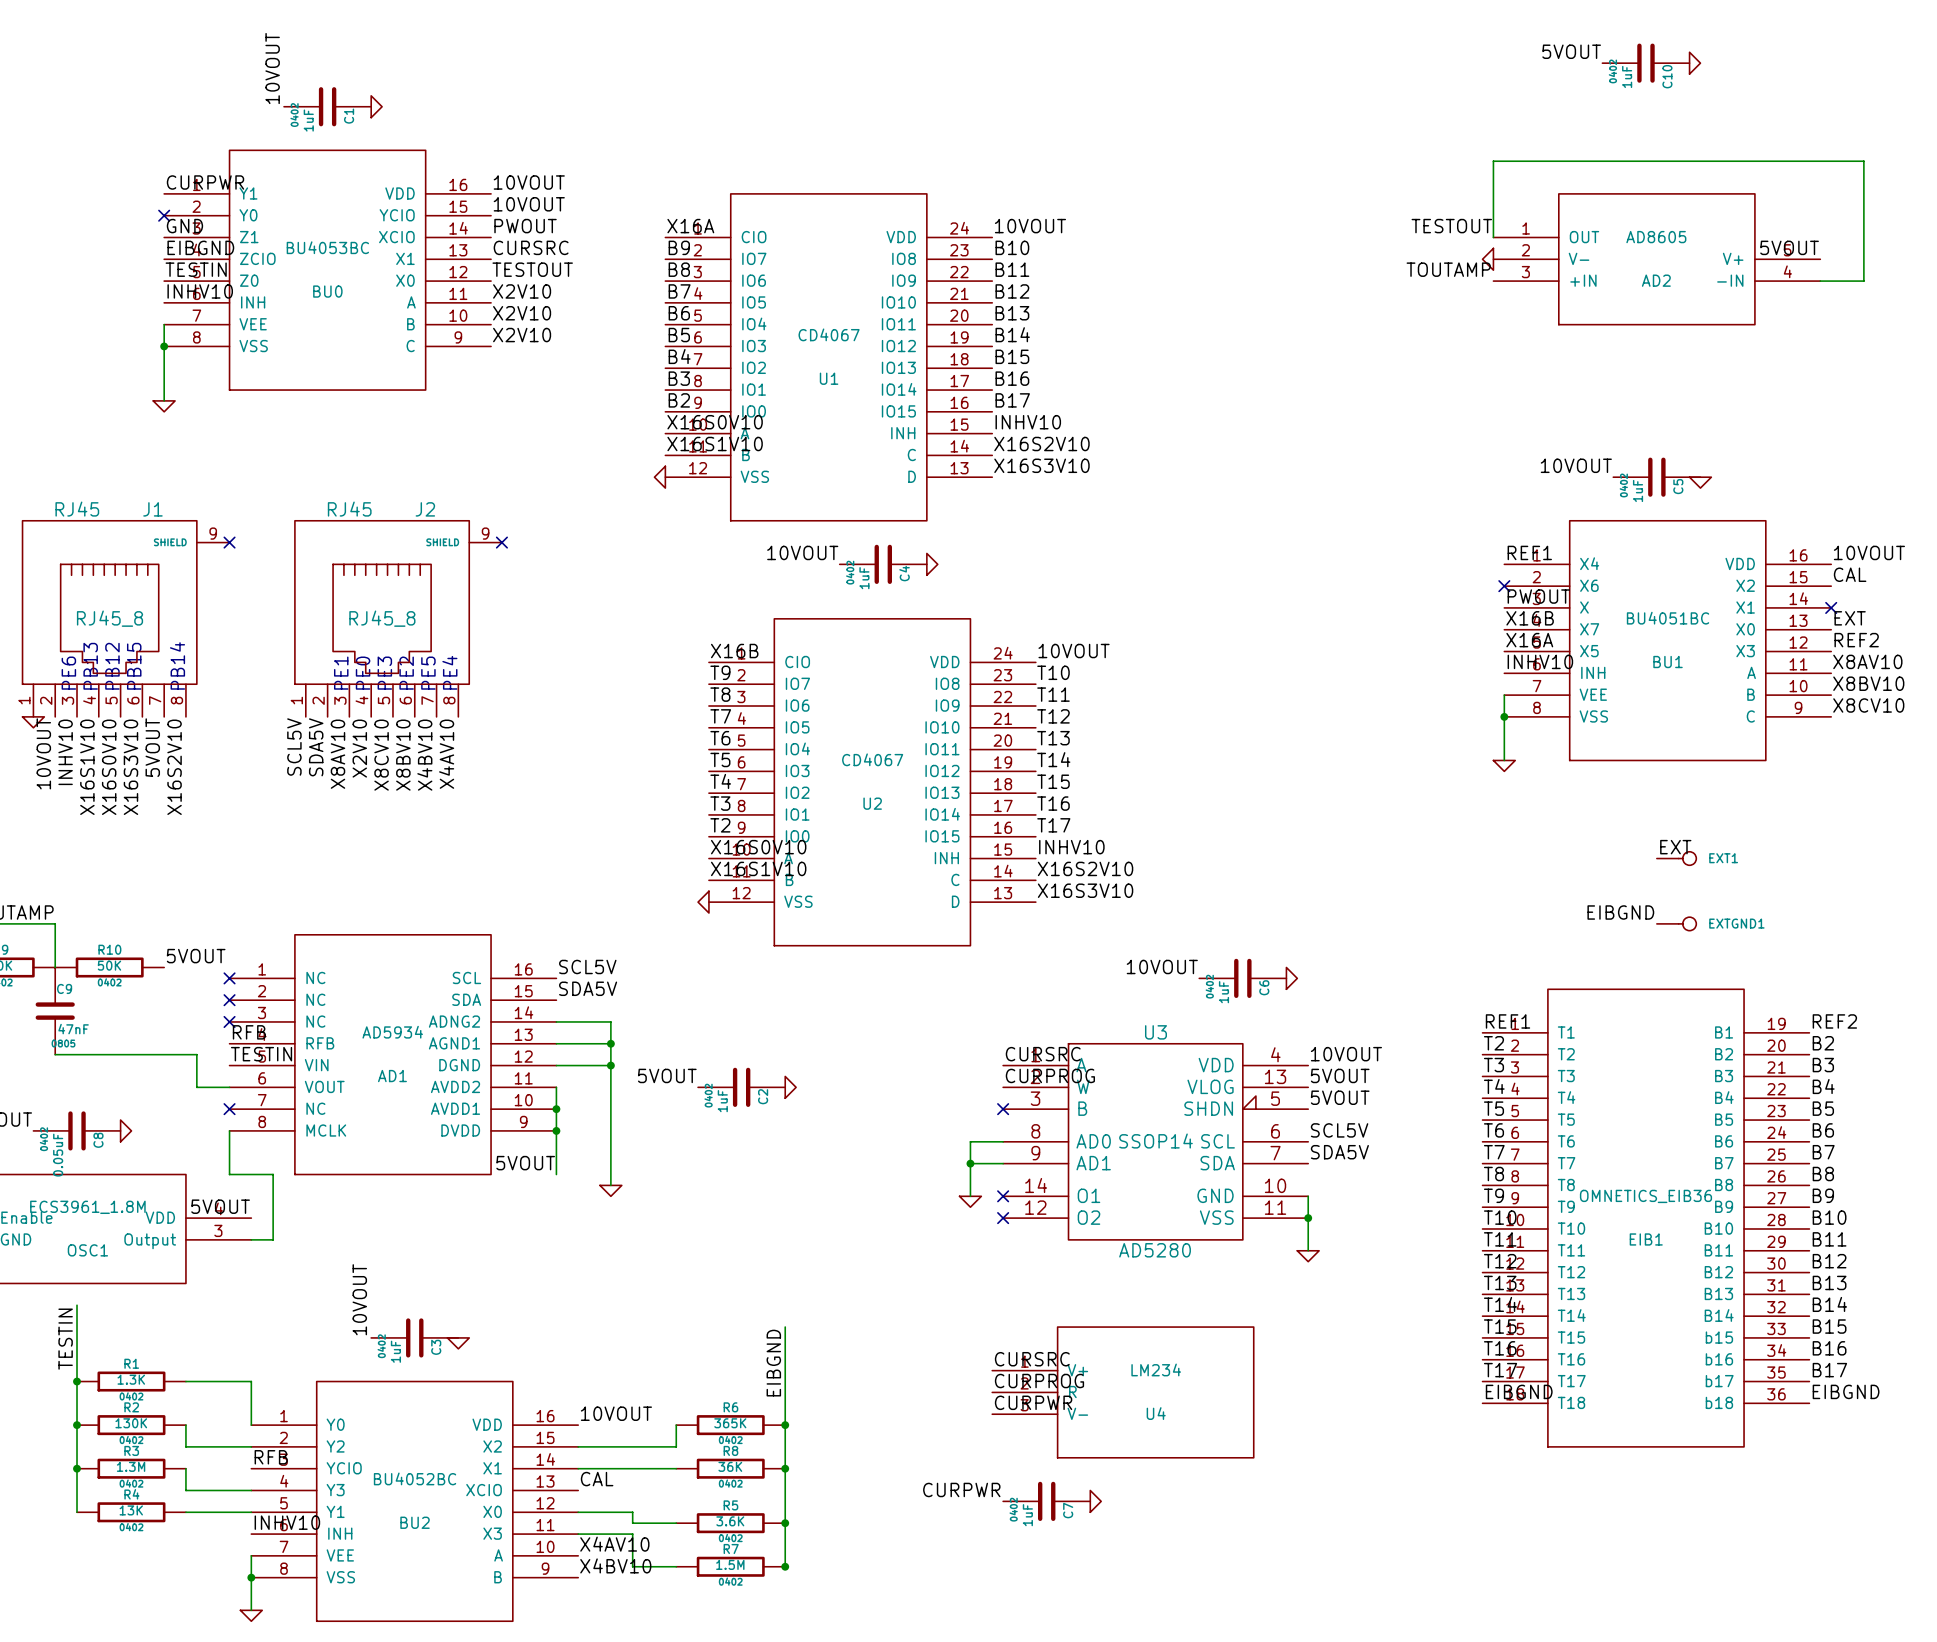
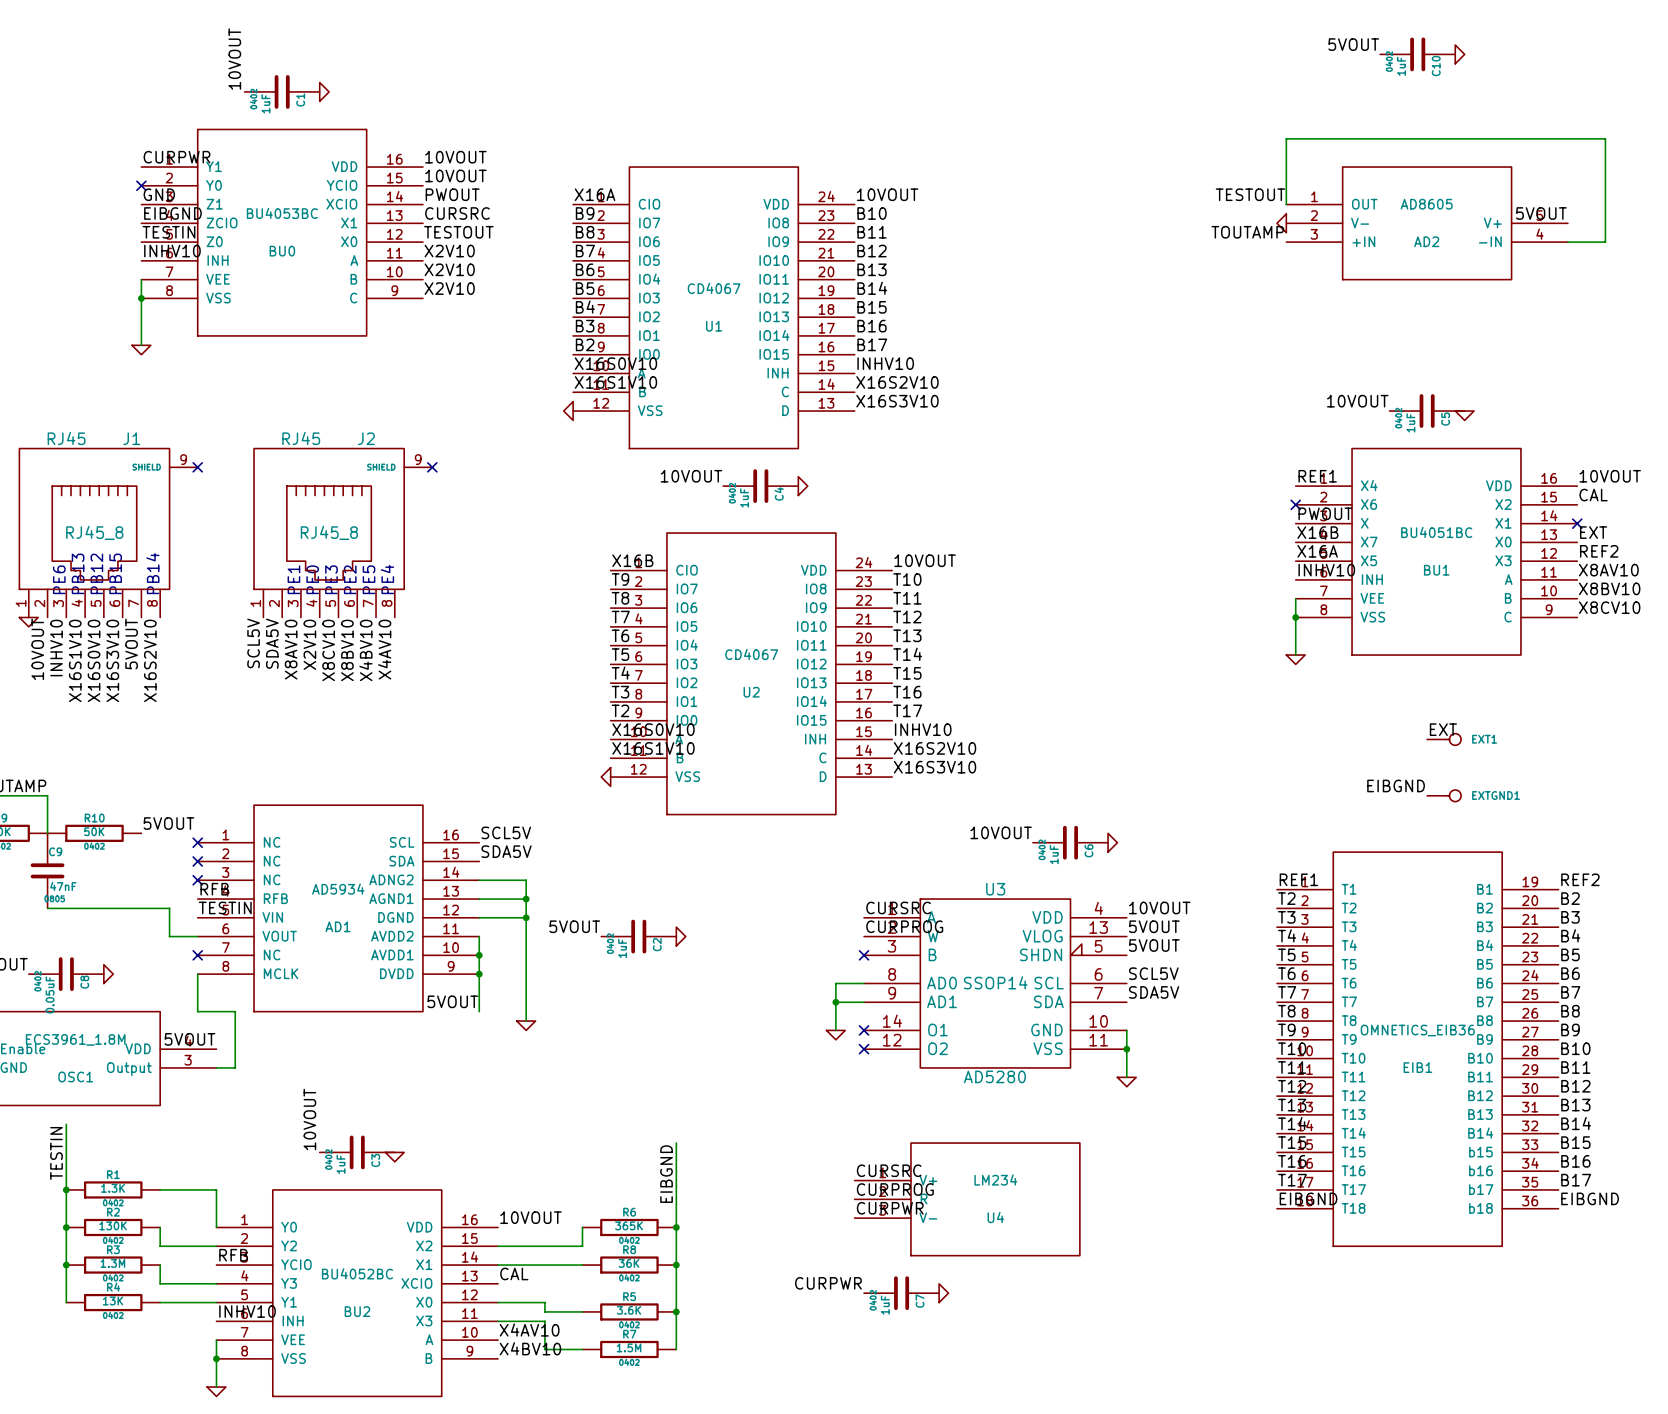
junction: (785, 1566) -> none

